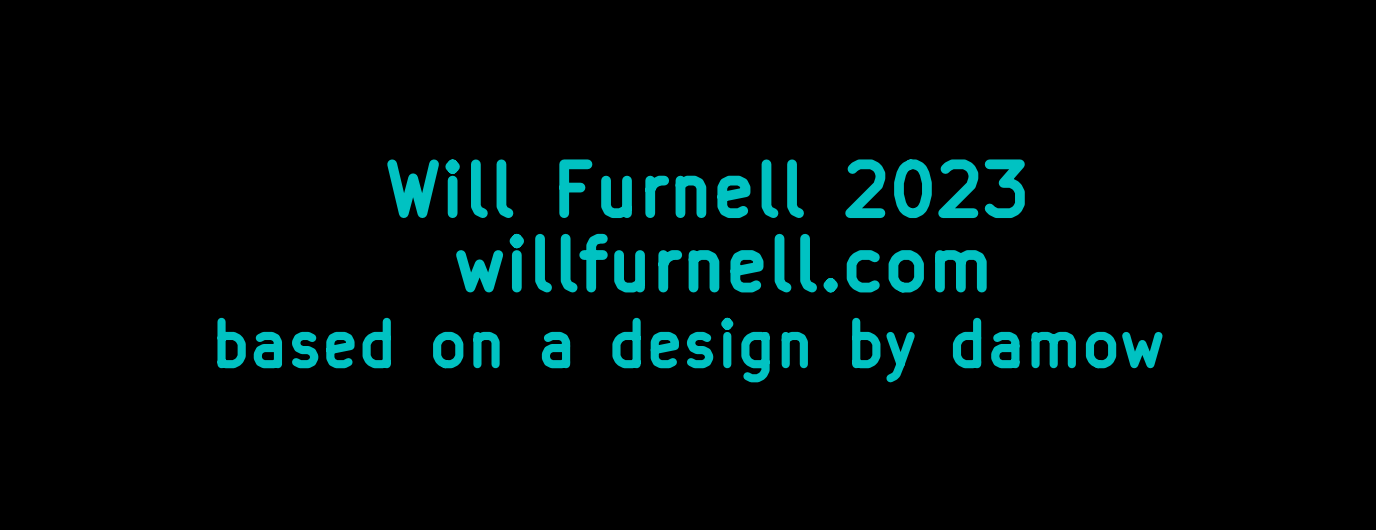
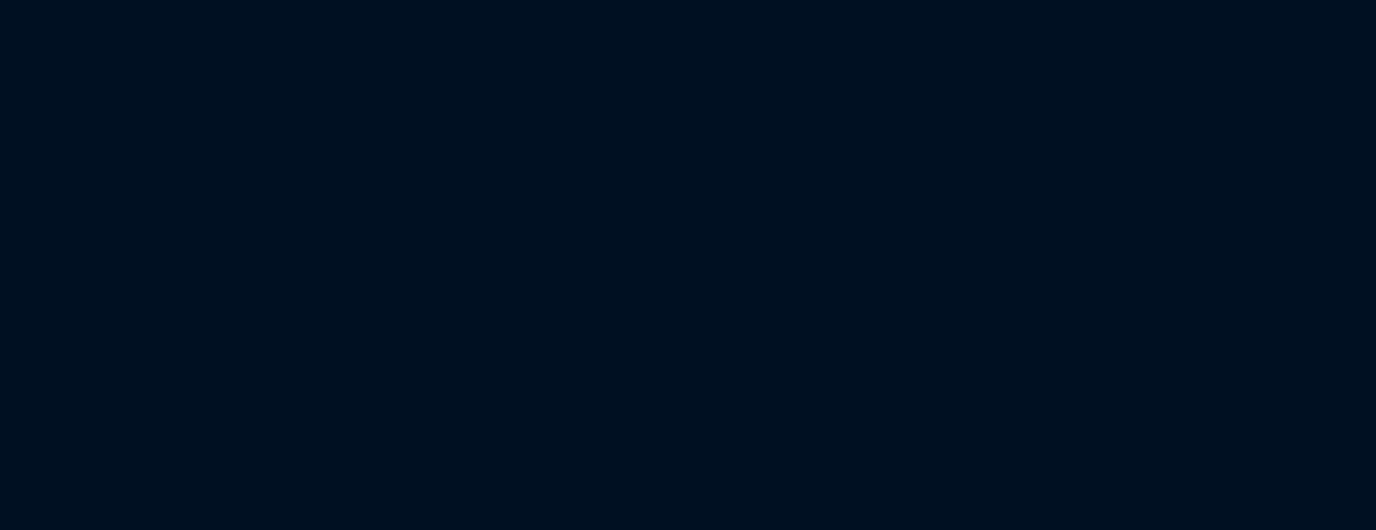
text: Will Furnell 2023 (706, 188) -> none
text: willfurnell.com (721, 263) -> none
text: based on a design by damow (690, 350) -> none

